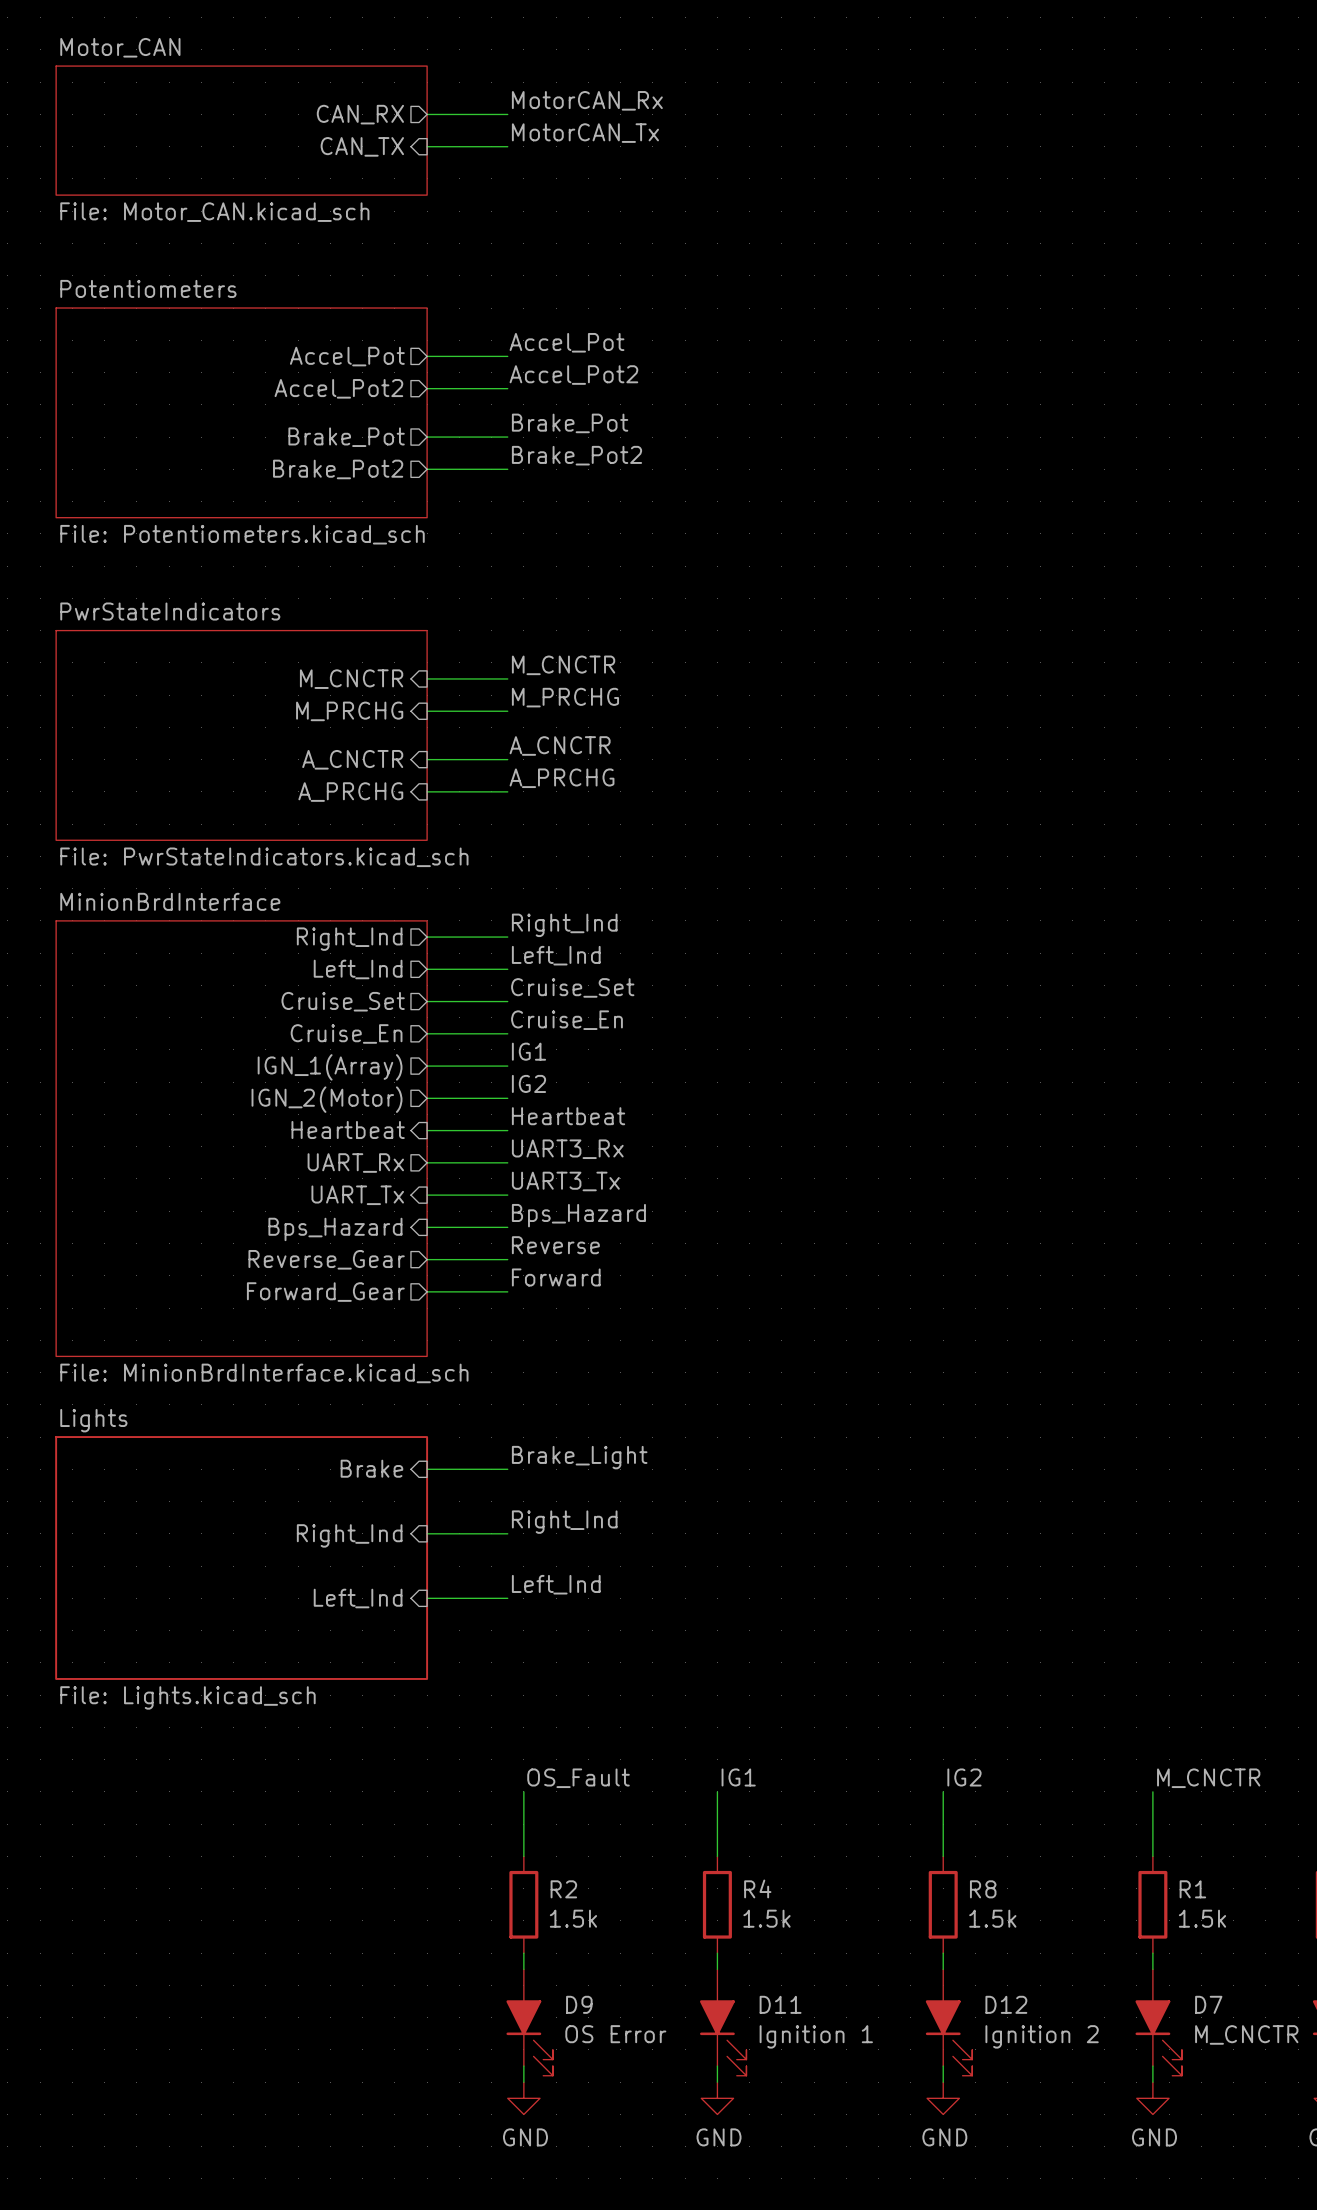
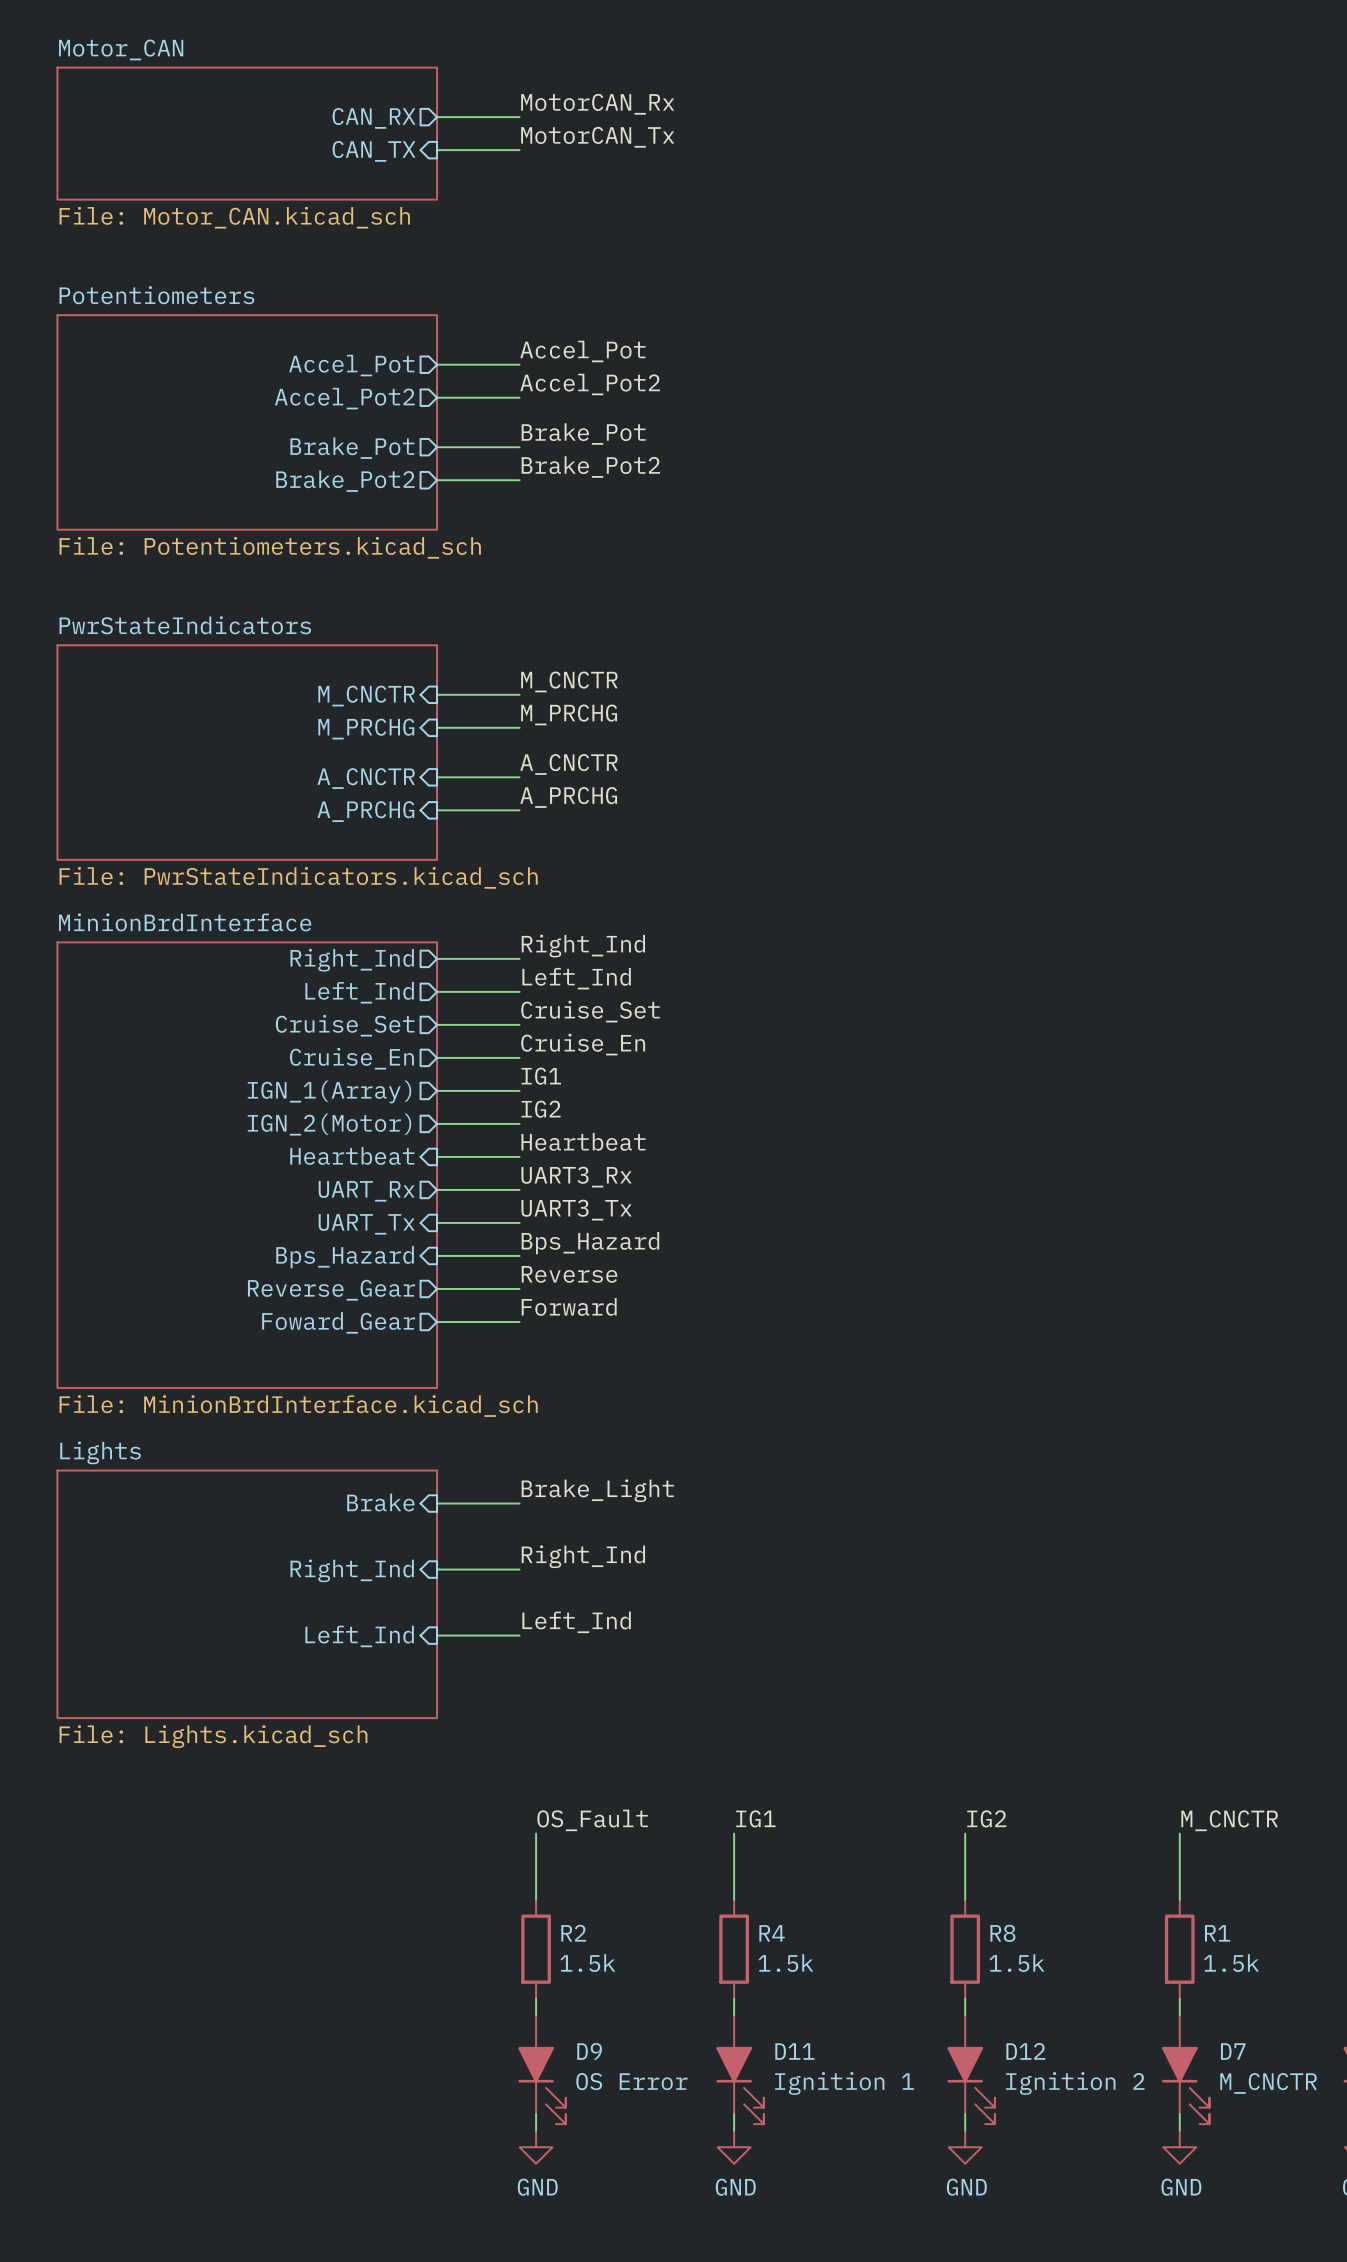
sheet pin: Forward_Gear (325, 1292) -> Foward_Gear (338, 1322)

